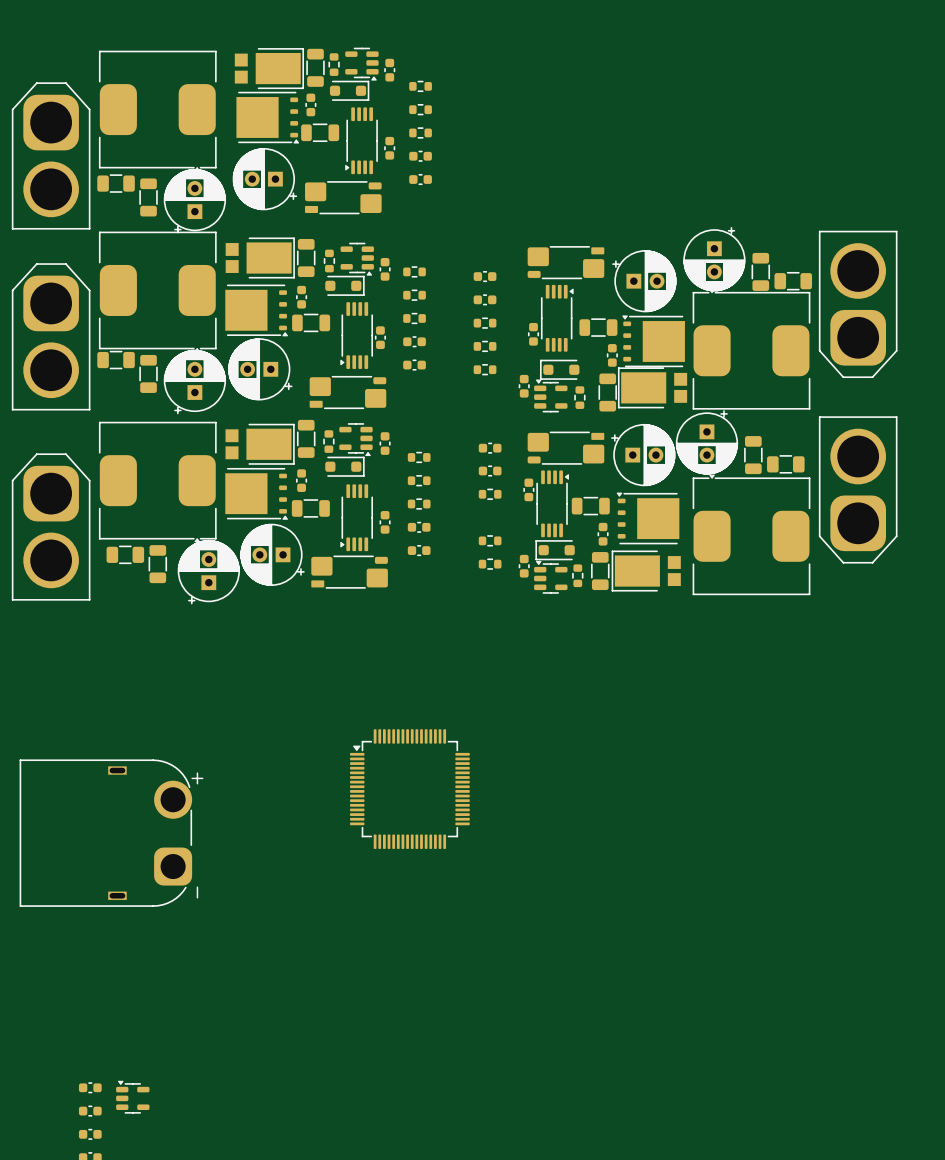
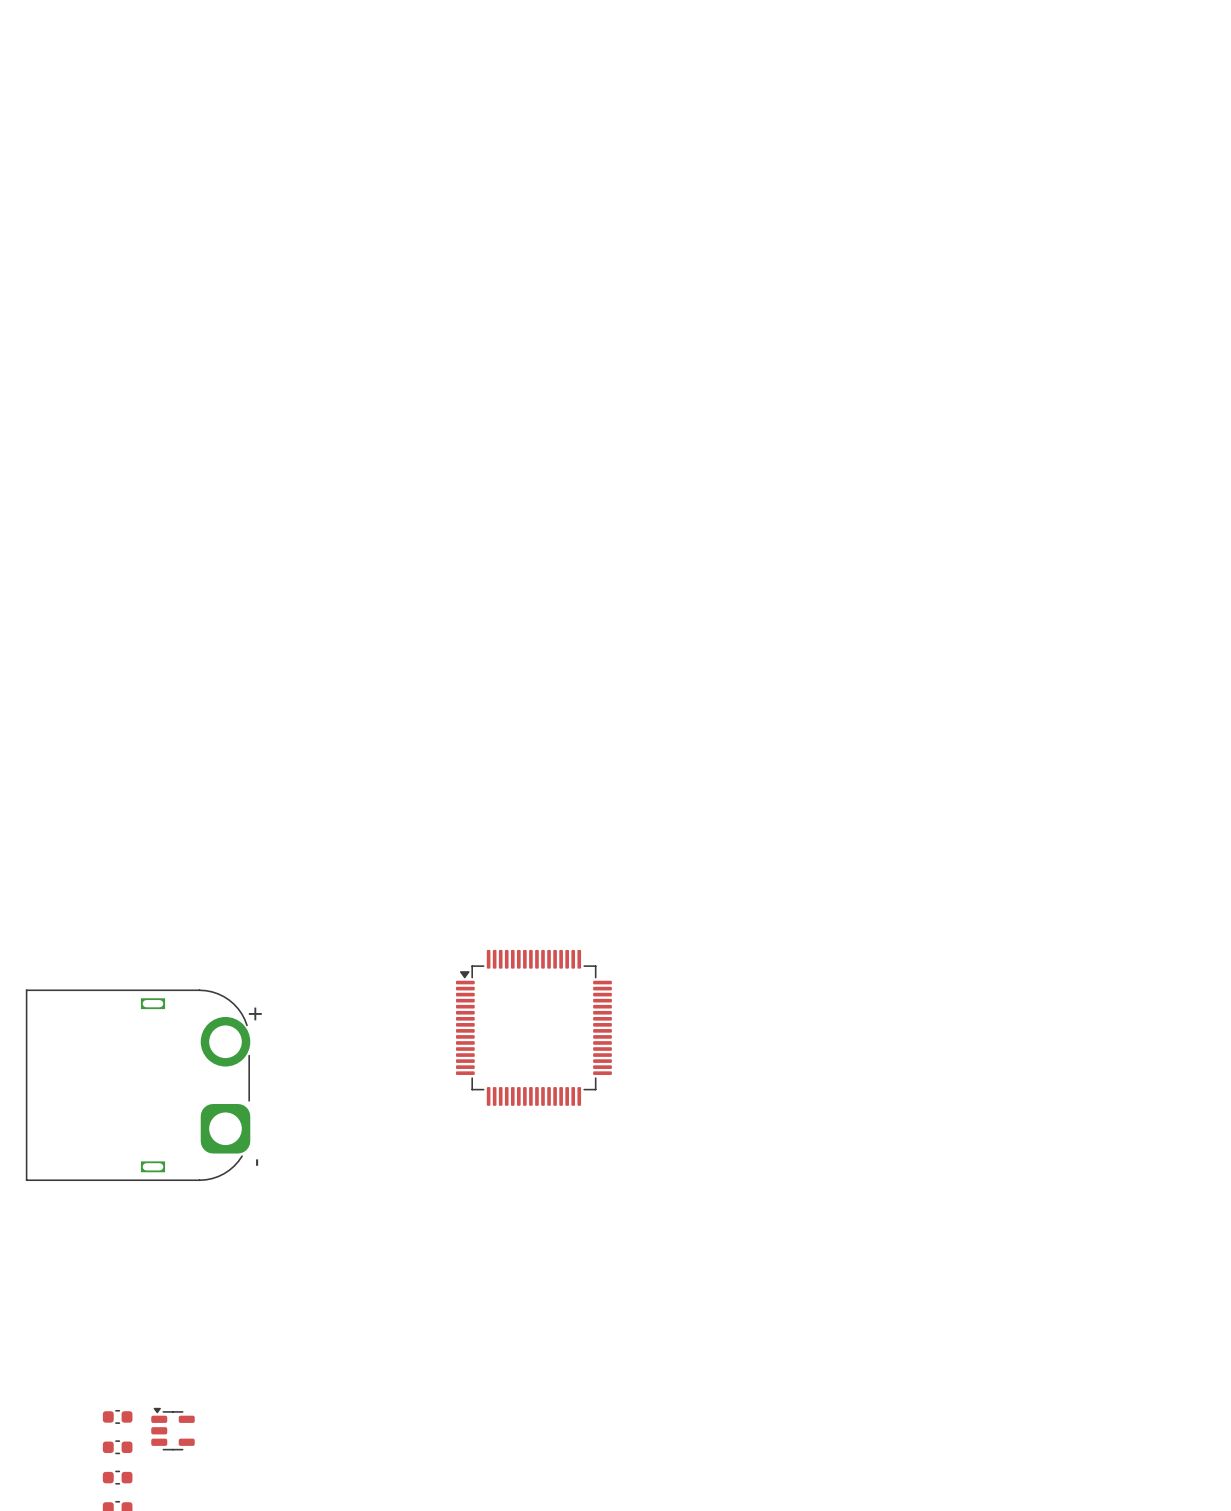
part: (334, 64) -> none
part: (361, 64) -> none
part: (315, 67) -> none
part: (269, 68) -> none
part: (389, 70) -> none
part: (420, 86) -> none
part: (349, 90) -> none
part: (310, 104) -> none
part: (420, 109) -> none
part: (157, 111) -> none
part: (267, 117) -> none
part: (320, 132) -> none
part: (420, 132) -> none
part: (361, 140) -> none
part: (389, 148) -> none
part: (51, 155) -> none
part: (420, 156) -> none
part: (264, 179) -> none
part: (420, 179) -> none
part: (116, 183) -> none
part: (148, 197) -> none
part: (343, 197) -> none
part: (194, 201) -> none
part: (260, 258) -> none
part: (306, 258) -> none
part: (357, 259) -> none
part: (714, 259) -> none
part: (329, 261) -> none
part: (565, 262) -> none
part: (385, 269) -> none
part: (414, 271) -> none
part: (760, 271) -> none
part: (485, 276) -> none
part: (644, 281) -> none
part: (793, 281) -> none
part: (344, 285) -> none
part: (157, 292) -> none
part: (414, 295) -> none
part: (301, 297) -> none
part: (485, 299) -> none
part: (858, 304) -> none
part: (256, 310) -> none
part: (414, 318) -> none
part: (557, 318) -> none
part: (311, 322) -> none
part: (485, 323) -> none
part: (598, 327) -> none
part: (533, 334) -> none
part: (356, 335) -> none
part: (51, 336) -> none
part: (380, 337) -> none
part: (414, 341) -> none
part: (653, 341) -> none
part: (485, 346) -> none
part: (751, 349) -> none
part: (612, 355) -> none
part: (116, 360) -> none
part: (414, 365) -> none
part: (260, 369) -> none
part: (485, 369) -> none
part: (559, 369) -> none
part: (148, 373) -> none
part: (194, 381) -> none
part: (524, 386) -> none
part: (652, 387) -> none
part: (347, 392) -> none
part: (607, 392) -> none
part: (550, 395) -> none
part: (579, 397) -> none
part: (306, 438) -> none
part: (355, 439) -> none
part: (328, 441) -> none
part: (706, 442) -> none
part: (385, 443) -> none
part: (259, 444) -> none
part: (490, 448) -> none
part: (565, 448) -> none
part: (643, 455) -> none
part: (753, 455) -> none
part: (419, 457) -> none
part: (785, 464) -> none
part: (344, 466) -> none
part: (490, 470) -> none
part: (301, 480) -> none
part: (419, 480) -> none
part: (157, 482) -> none
part: (528, 489) -> none
part: (858, 489) -> none
part: (256, 493) -> none
part: (490, 494) -> none
part: (552, 503) -> none
part: (419, 504) -> none
part: (590, 506) -> none
part: (310, 508) -> none
part: (356, 517) -> none
part: (648, 518) -> none
part: (385, 522) -> none
part: (51, 527) -> none
part: (419, 527) -> none
part: (603, 534) -> none
part: (751, 534) -> none
part: (490, 540) -> none
part: (419, 550) -> none
part: (555, 550) -> none
part: (125, 554) -> none
part: (272, 554) -> none
part: (157, 564) -> none
part: (490, 564) -> none
part: (524, 566) -> none
part: (600, 571) -> none
part: (646, 571) -> none
part: (208, 572) -> none
part: (349, 572) -> none
part: (577, 575) -> none
part: (550, 577) -> none

